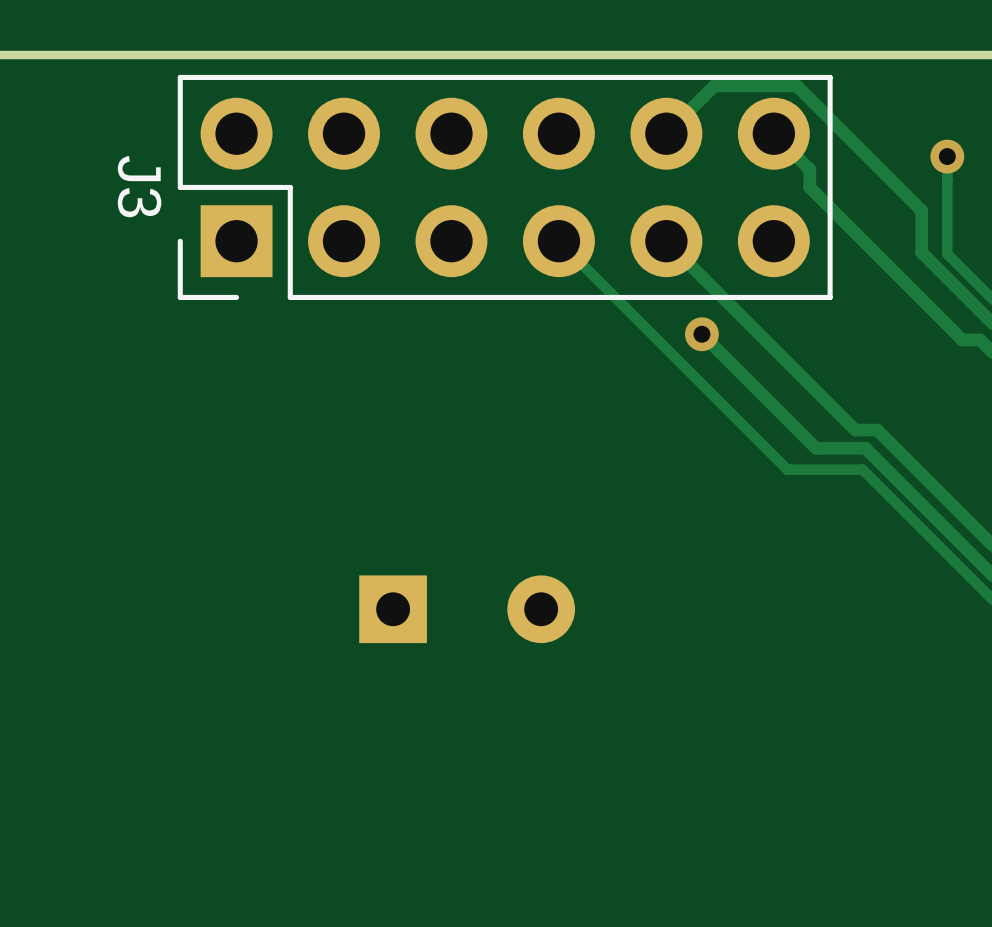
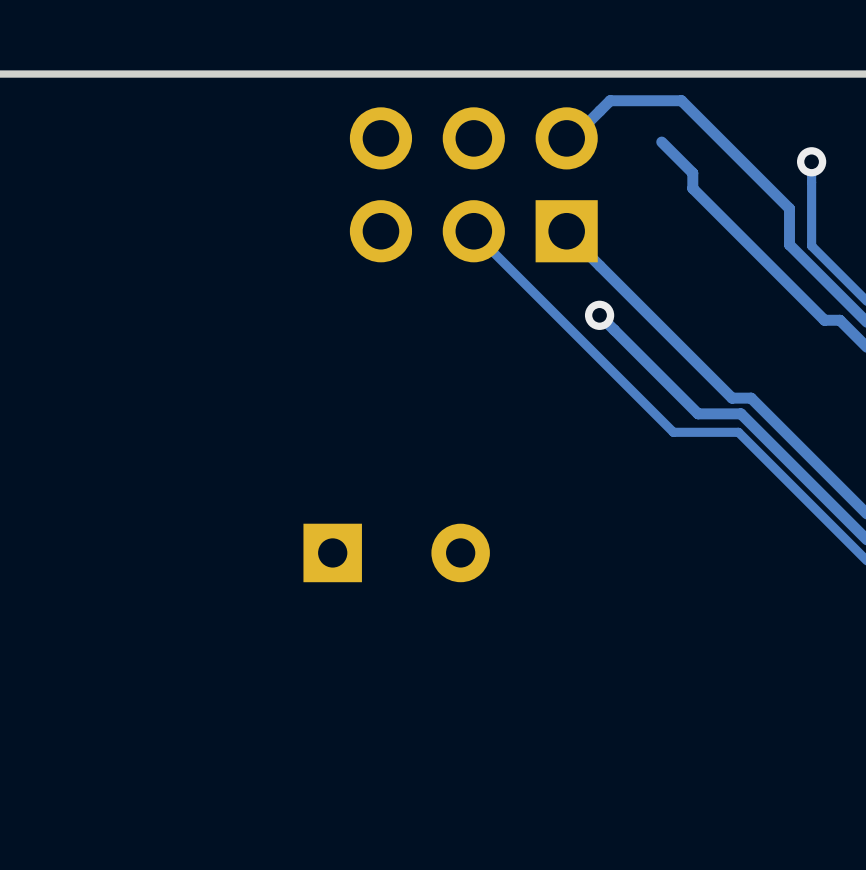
part: none -> (473, 184)
J3: (505, 187) -> none

